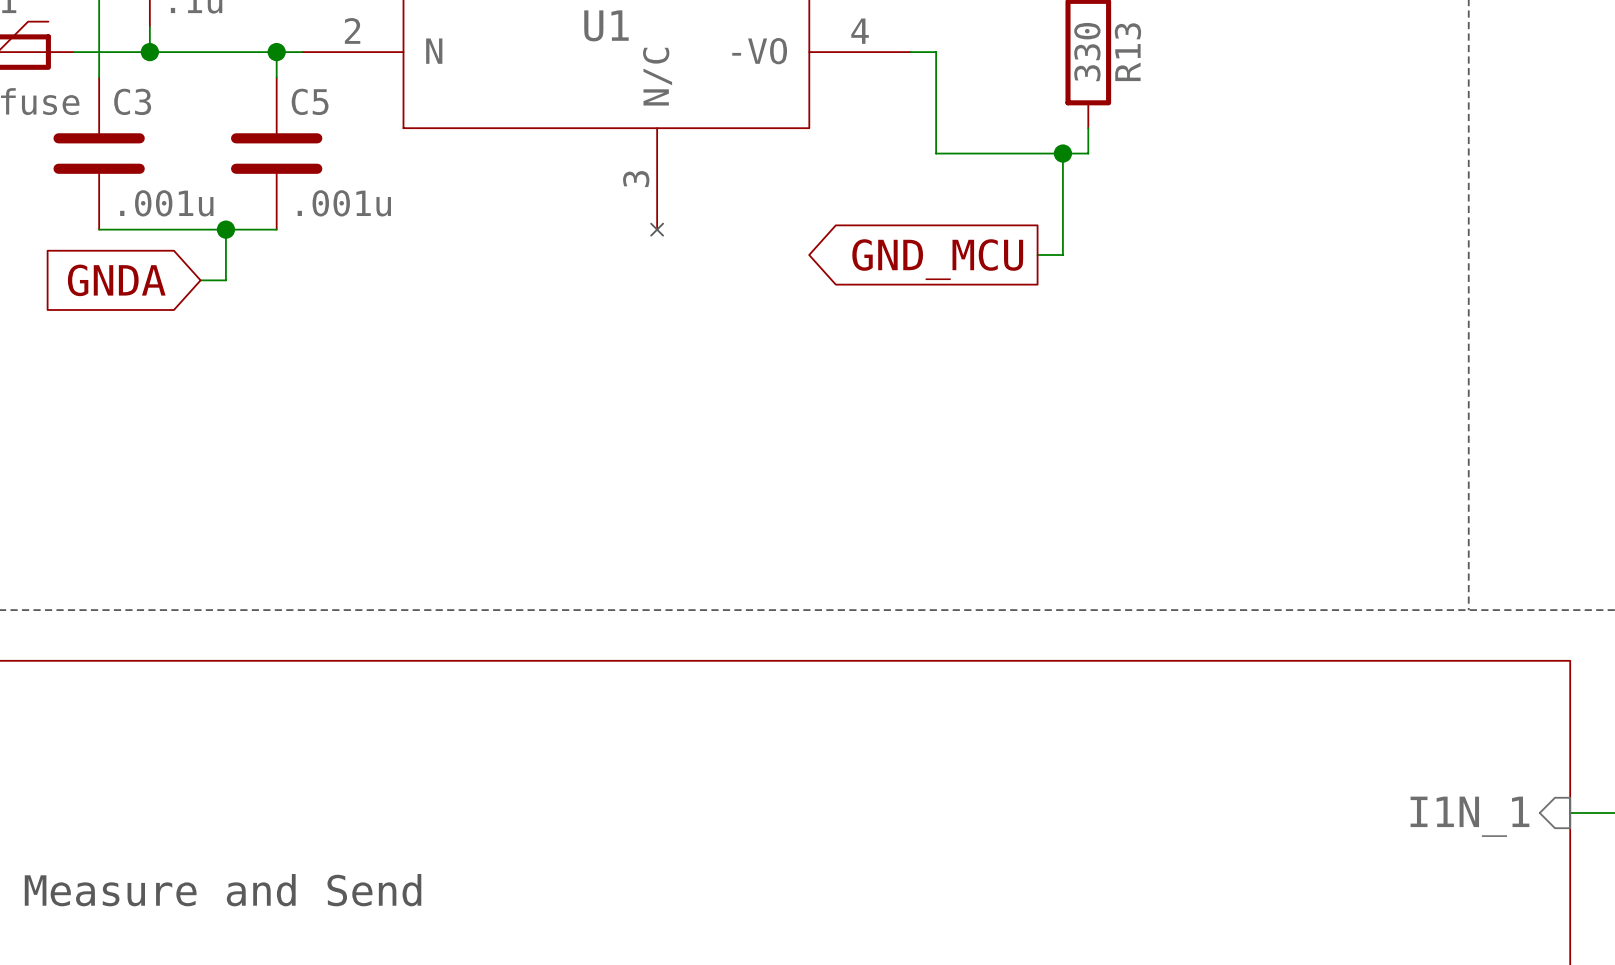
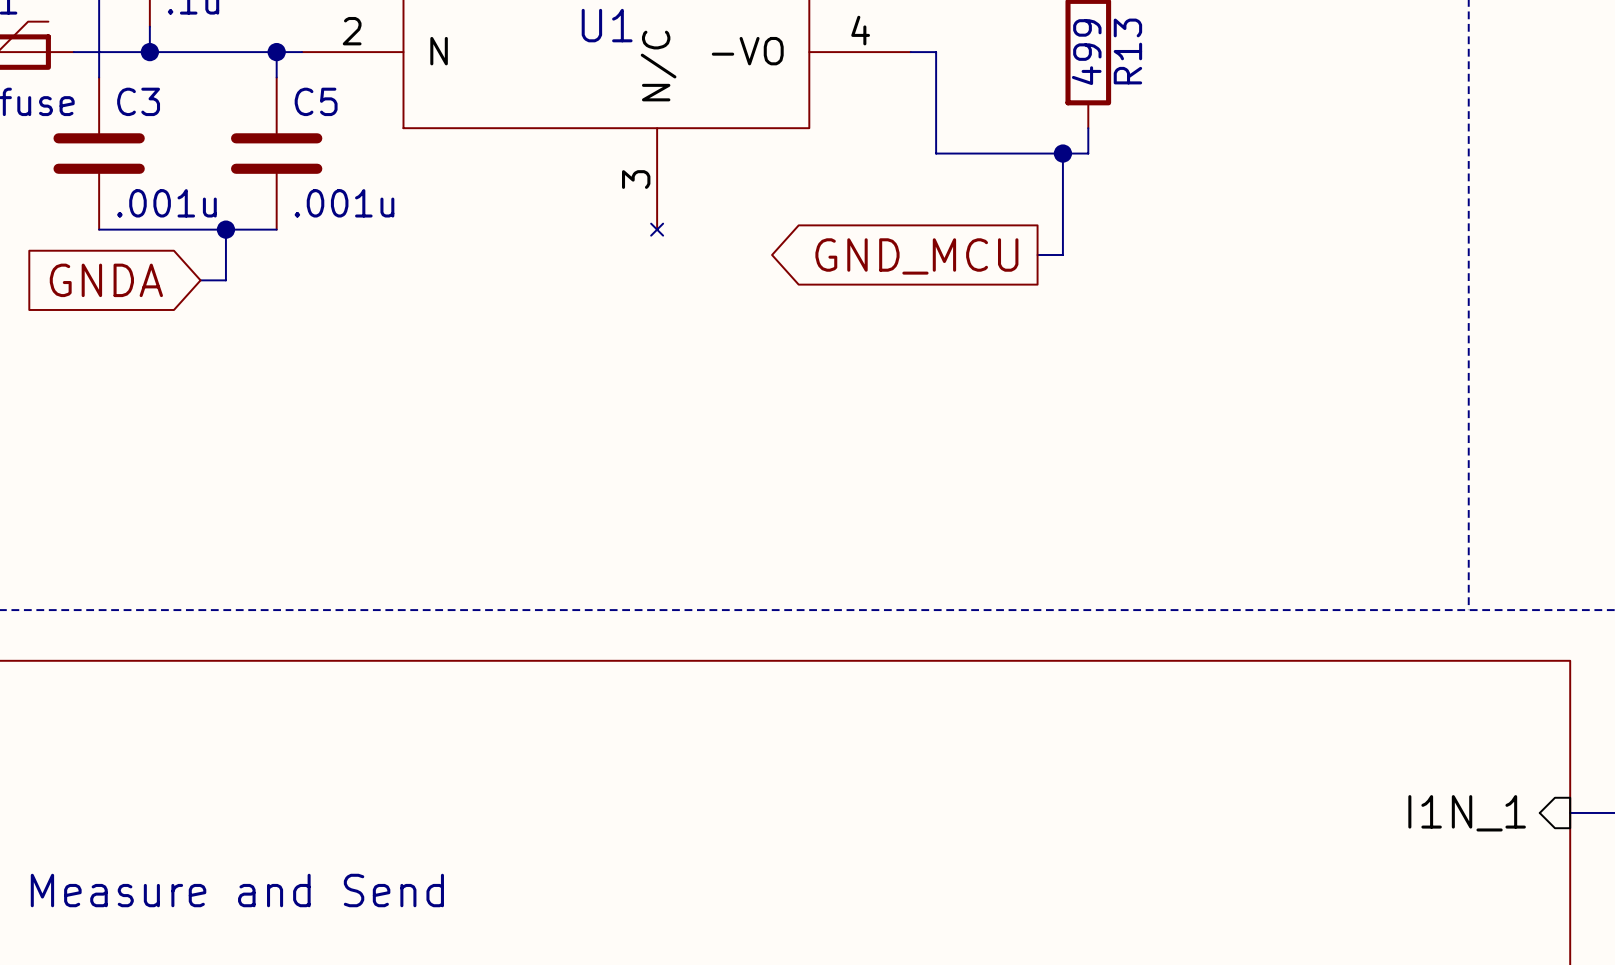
R13 value: 330 (1087, 52) -> 499 (1086, 52)

